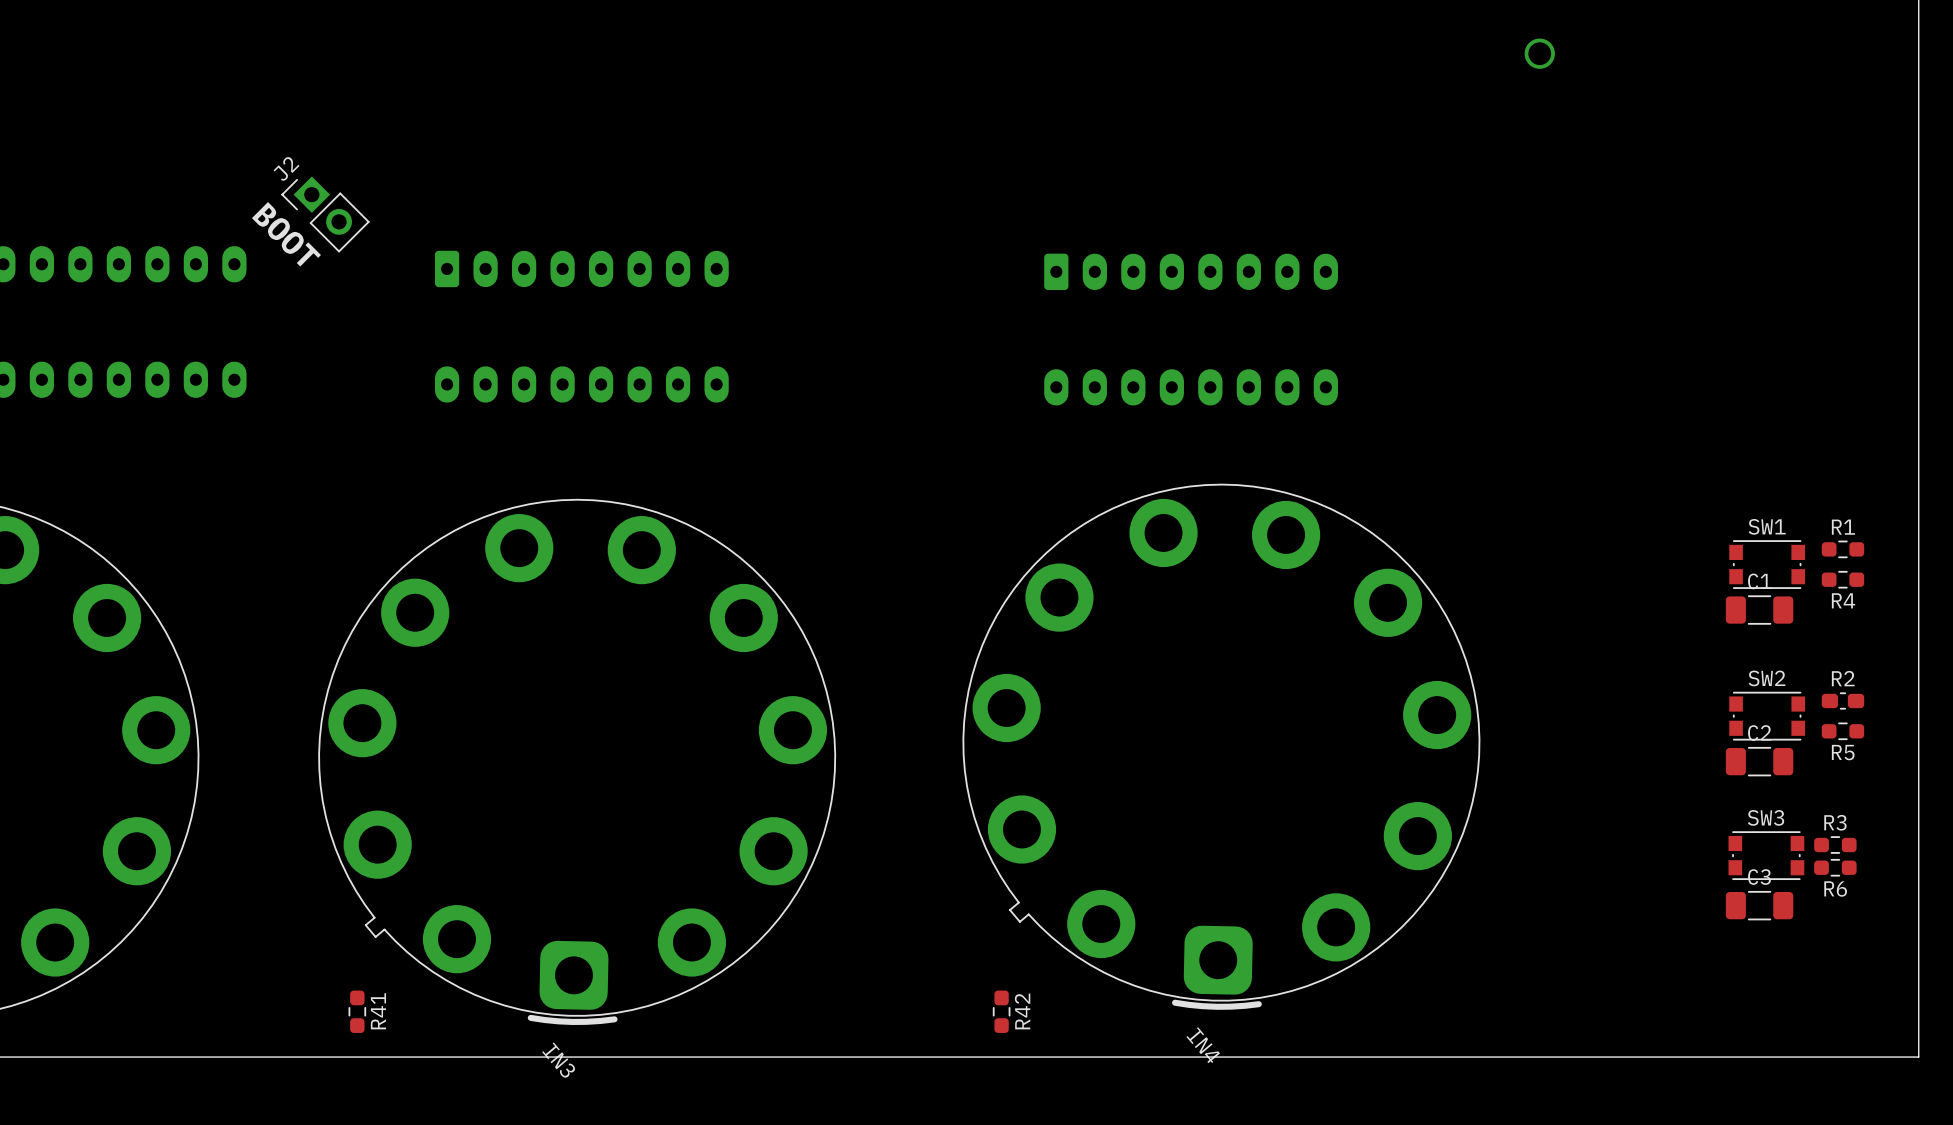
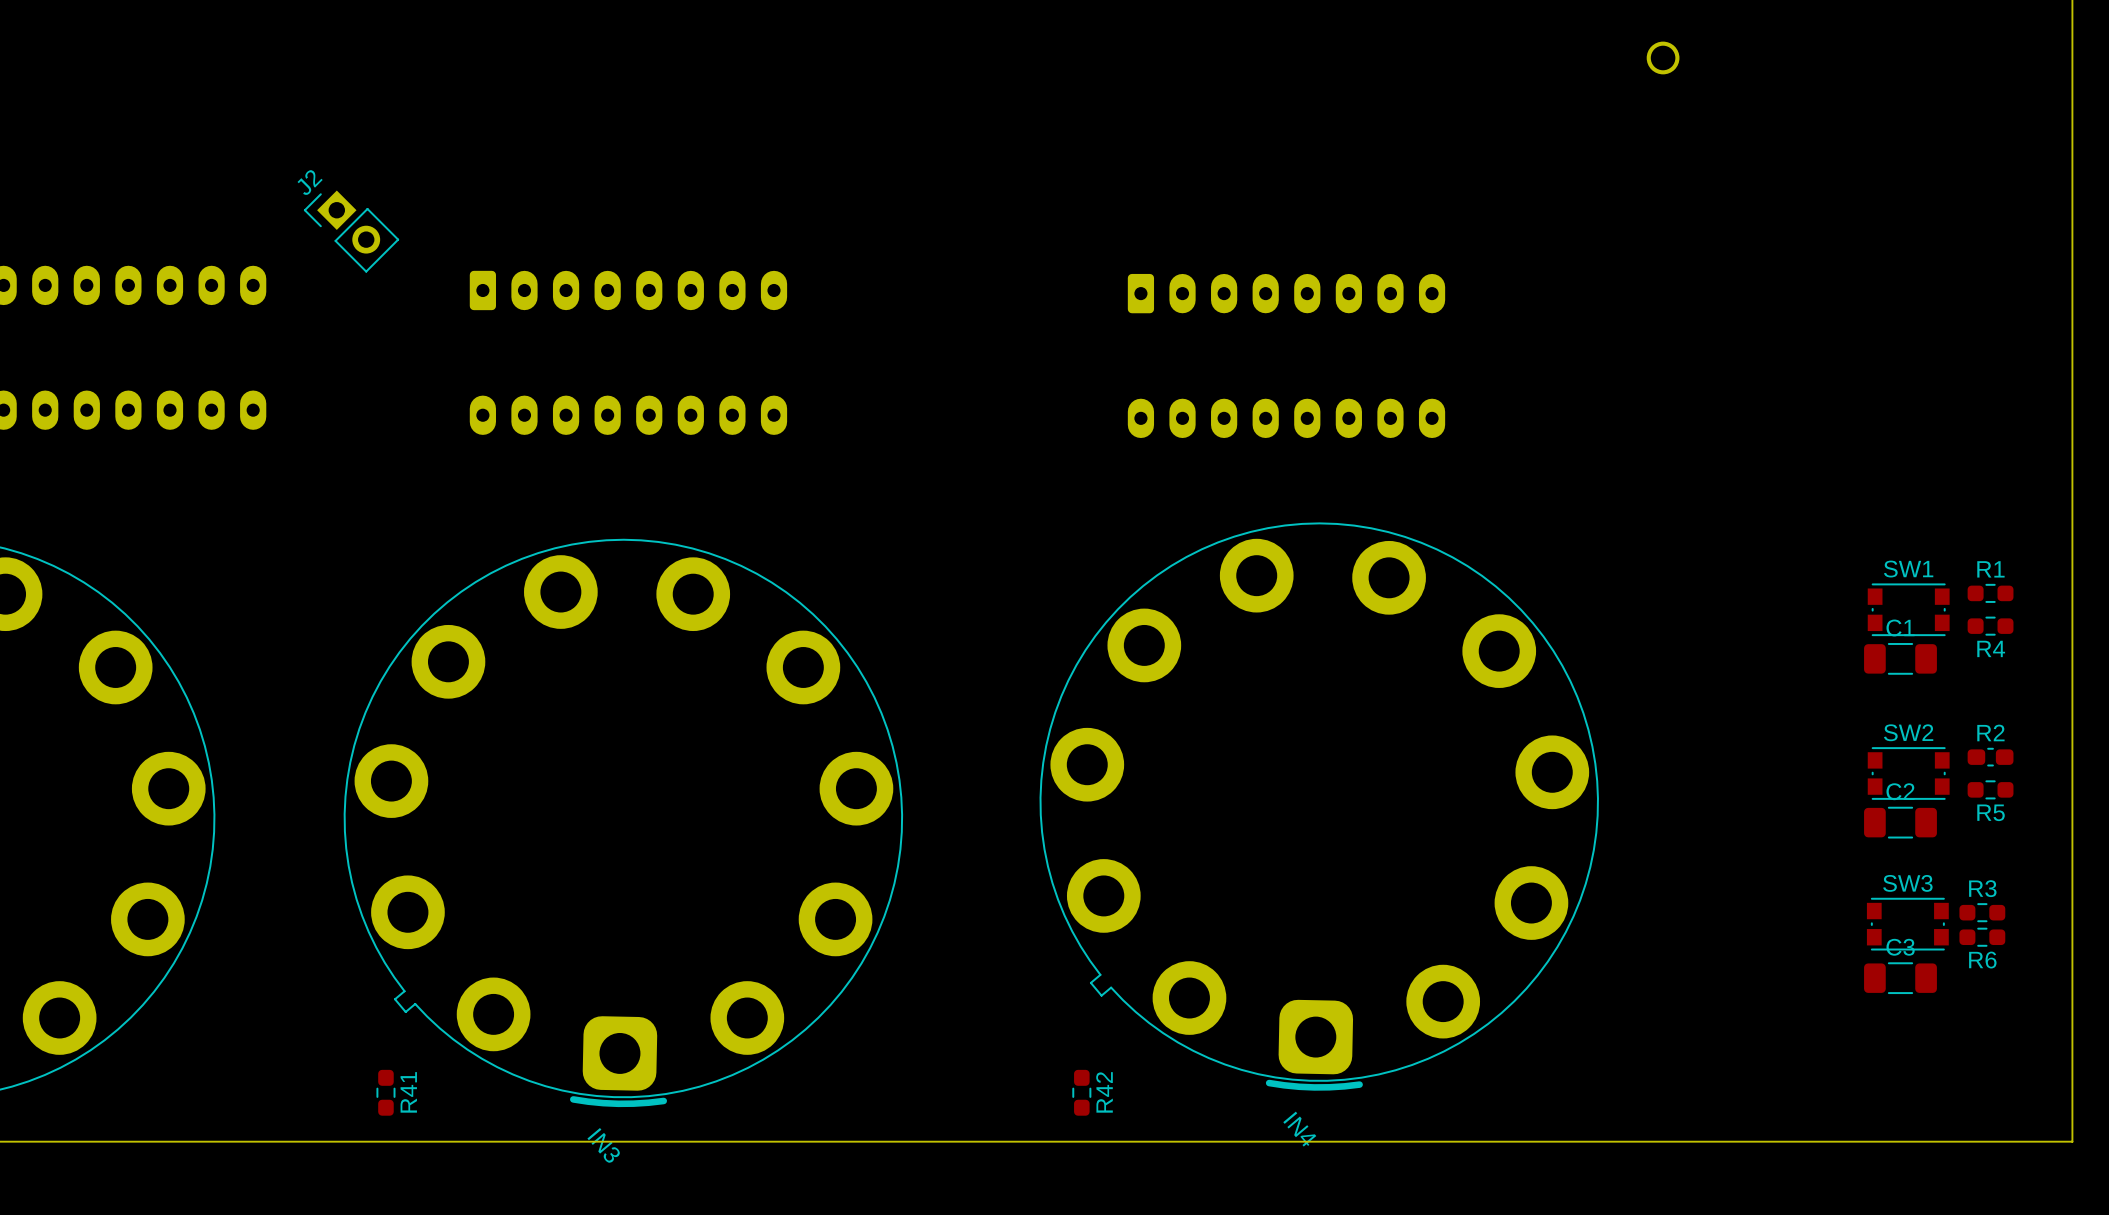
text: BOOT (286, 234) -> none

